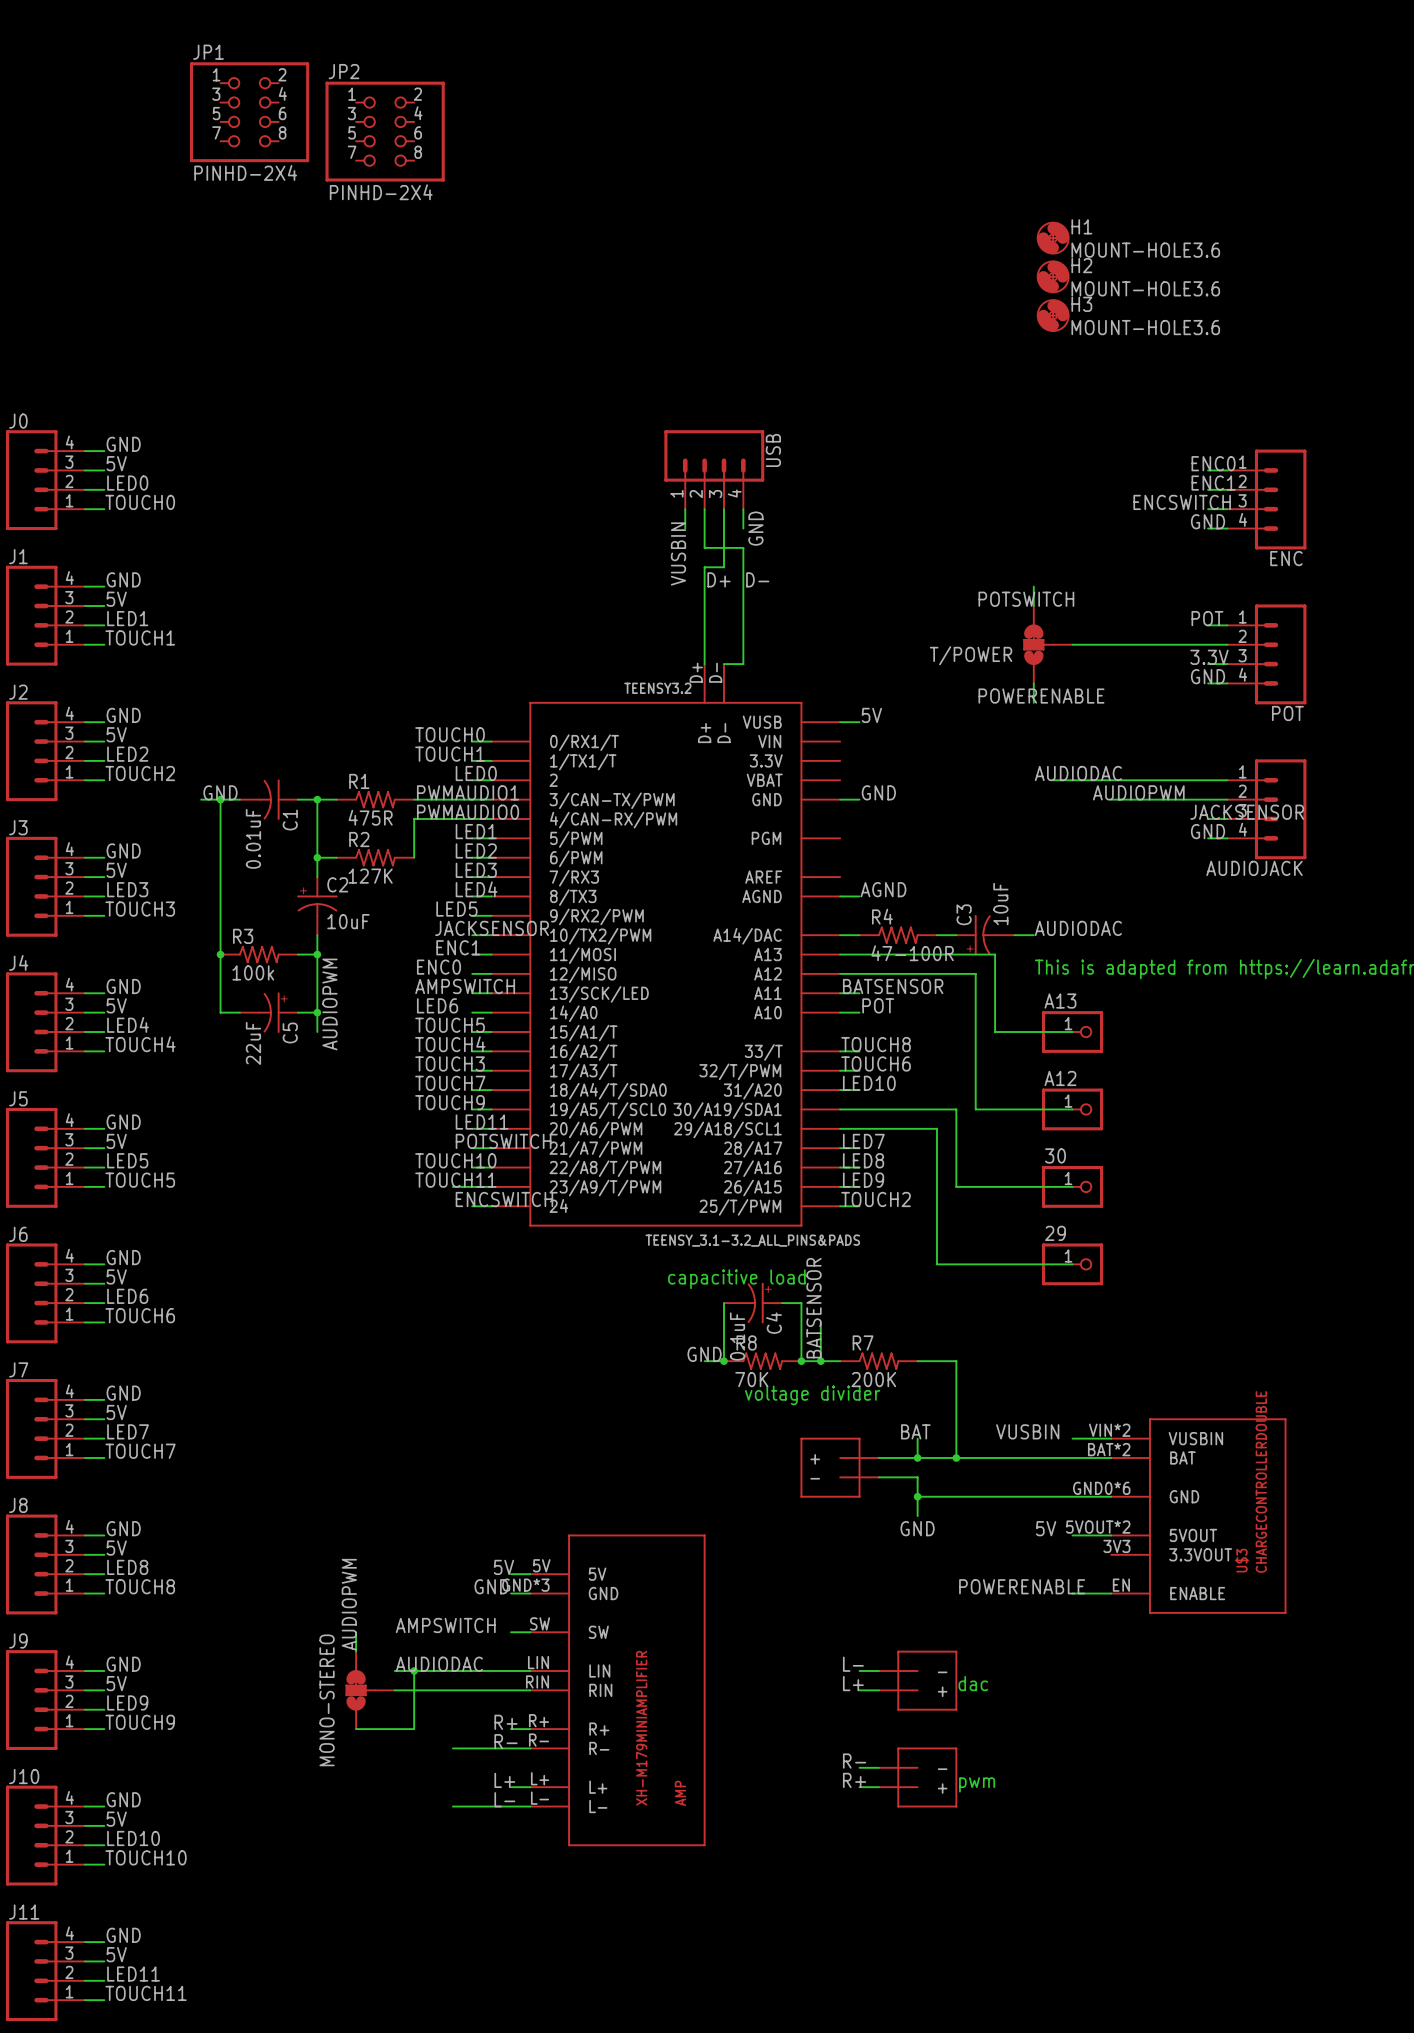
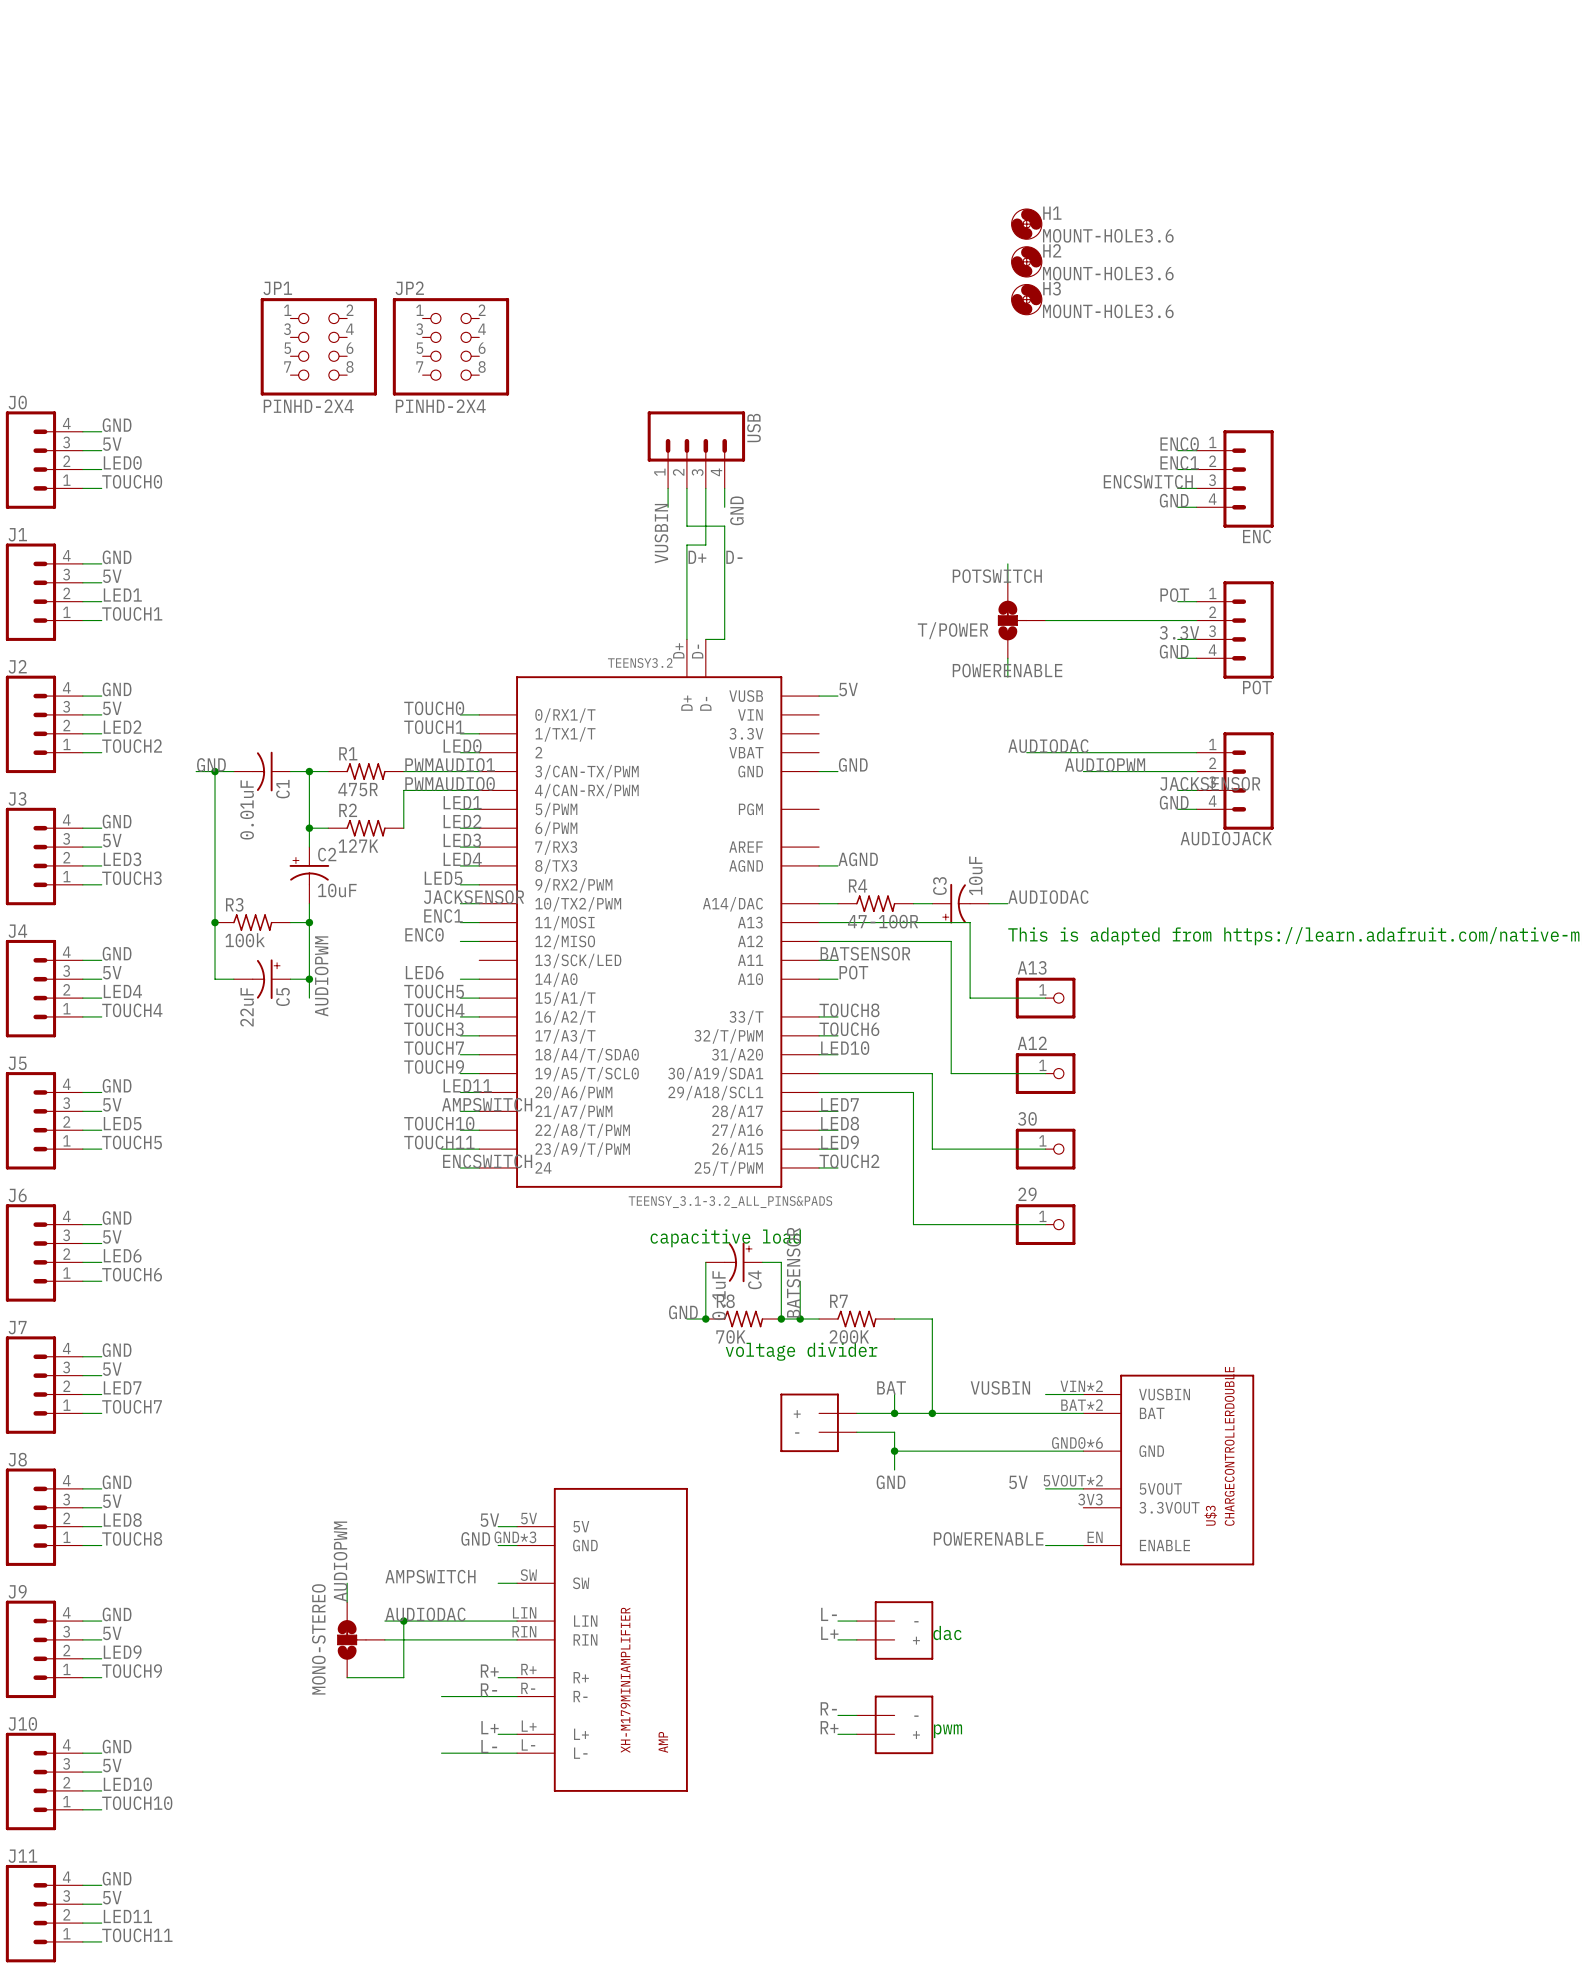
JP1 position: (249, 112) -> (318, 346)
JP2 position: (385, 131) -> (450, 346)
label: AMPSWITCH (465, 986) -> none
wire: (472, 993) (491, 993) -> none
label: POTSWITCH (503, 1141) -> AMPSWITCH (487, 1104)

